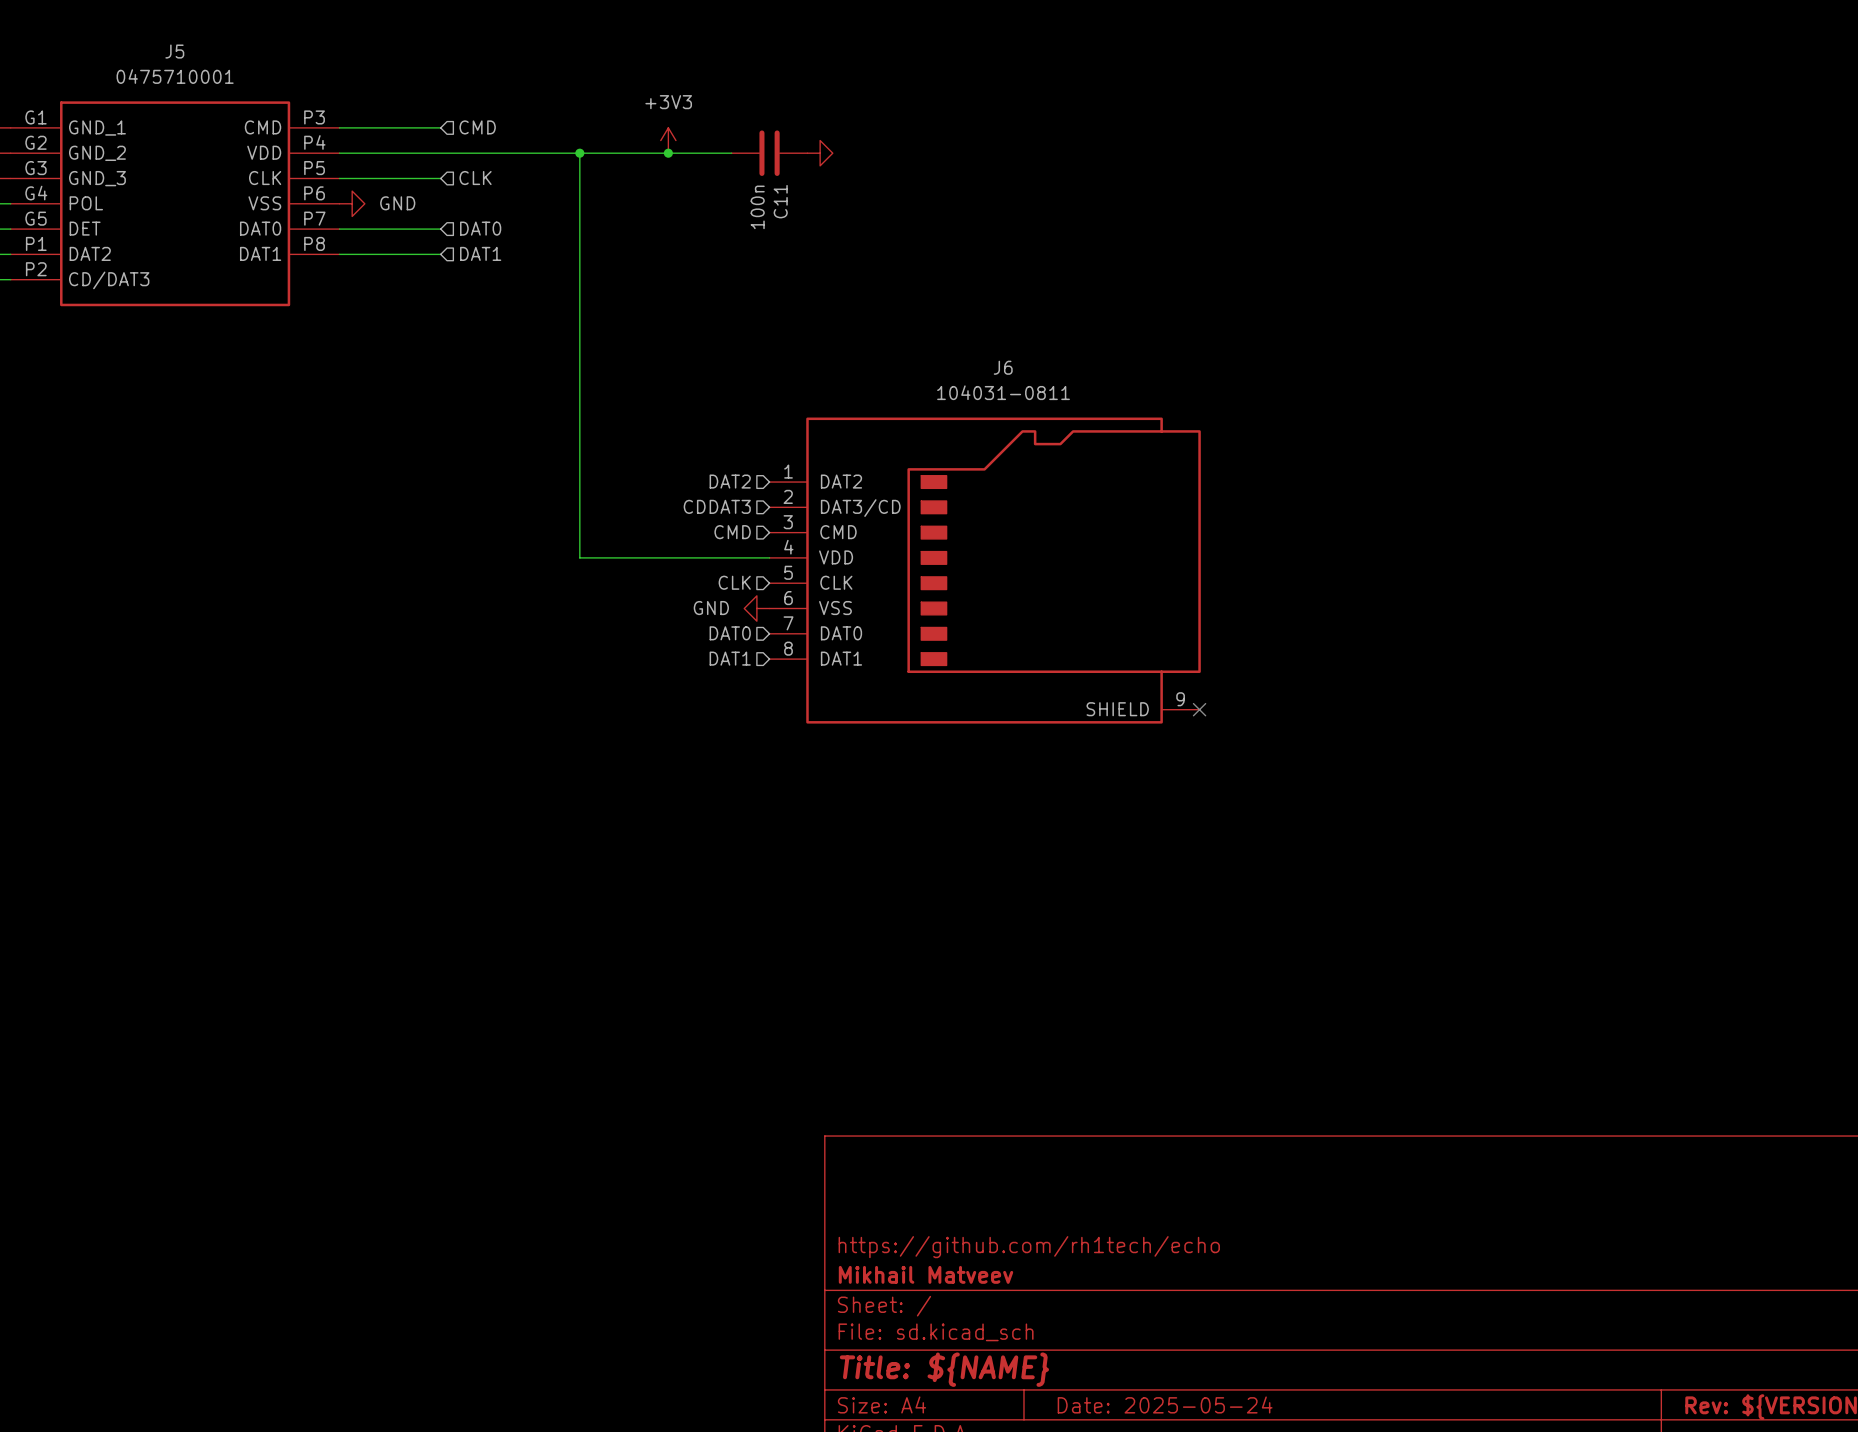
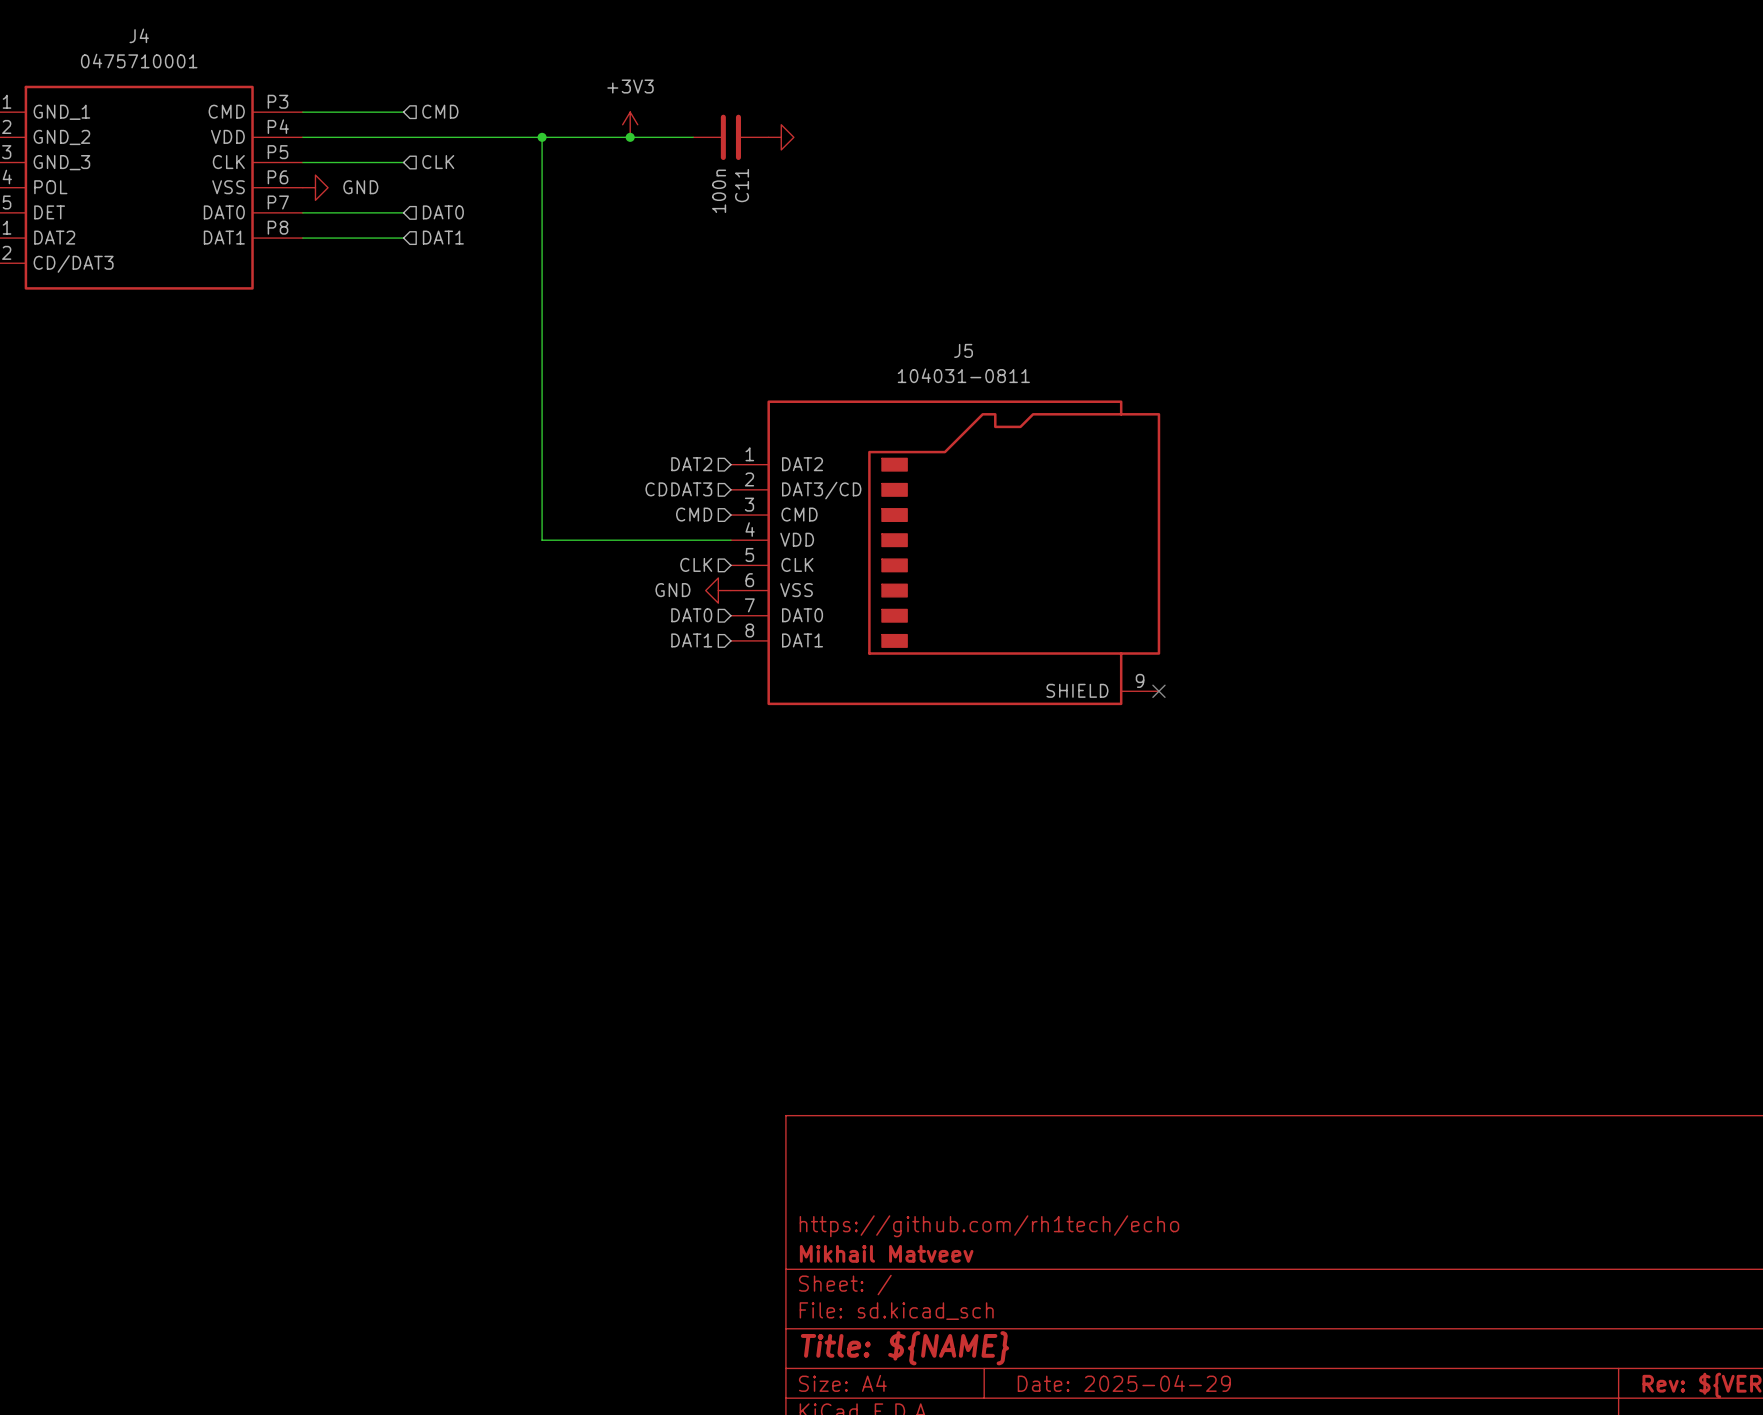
J5 name: J5 (174, 51) -> J4 (139, 35)
J6 name: J6 (1003, 367) -> J5 (963, 350)
title block: Date: 2025-05-24 (1165, 1404) -> Date: 2025-04-29 (1124, 1383)

